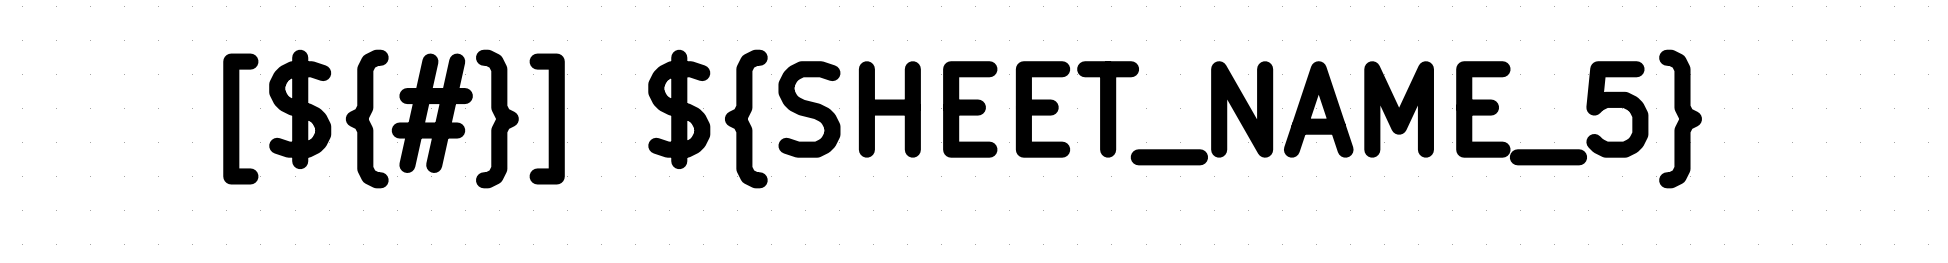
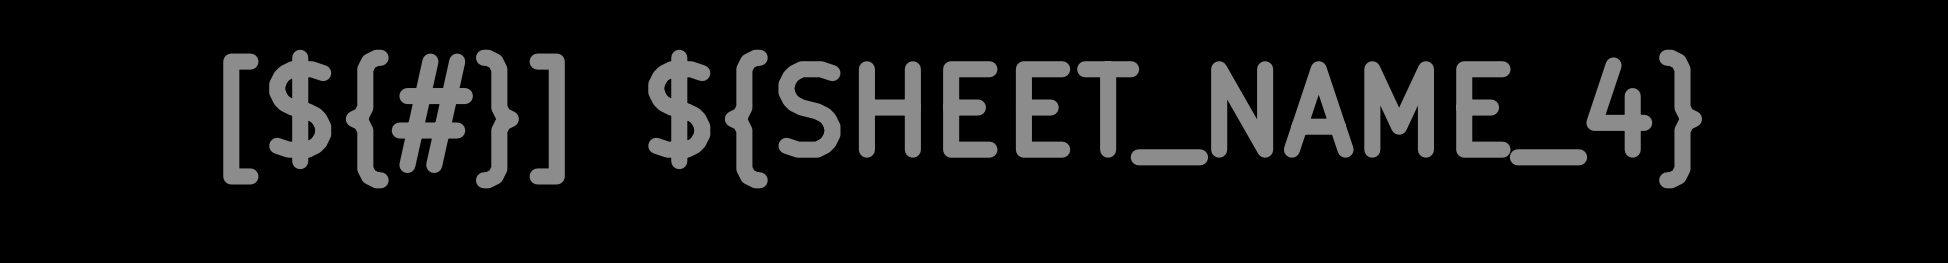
text: [${#}] ${SHEET_NAME_5} (962, 119) -> [${#}] ${SHEET_NAME_4} (962, 119)

